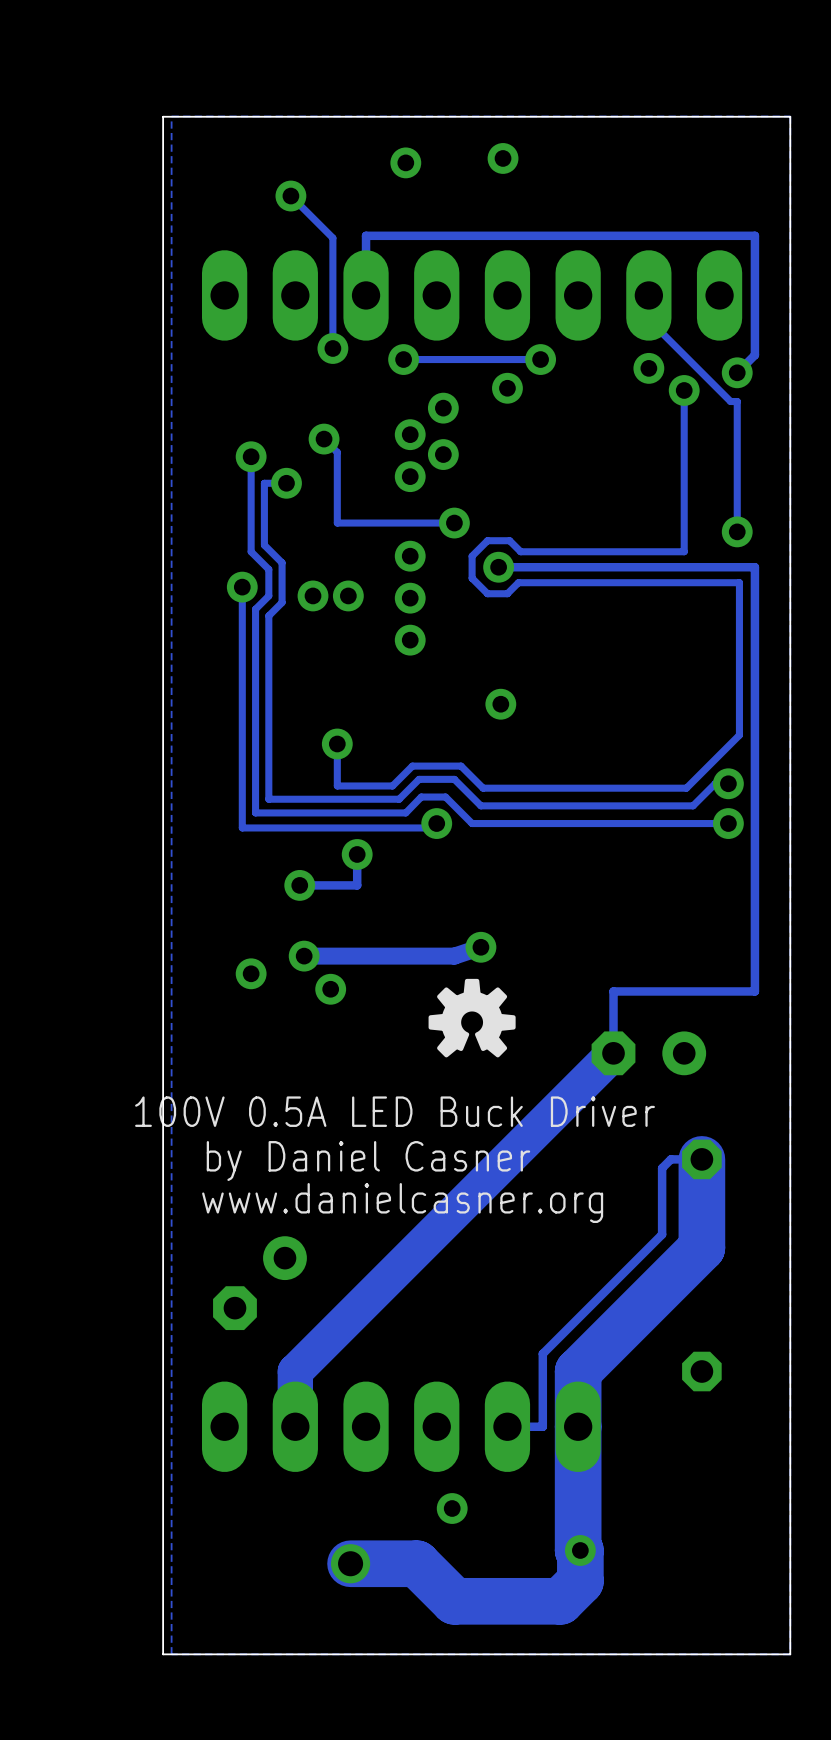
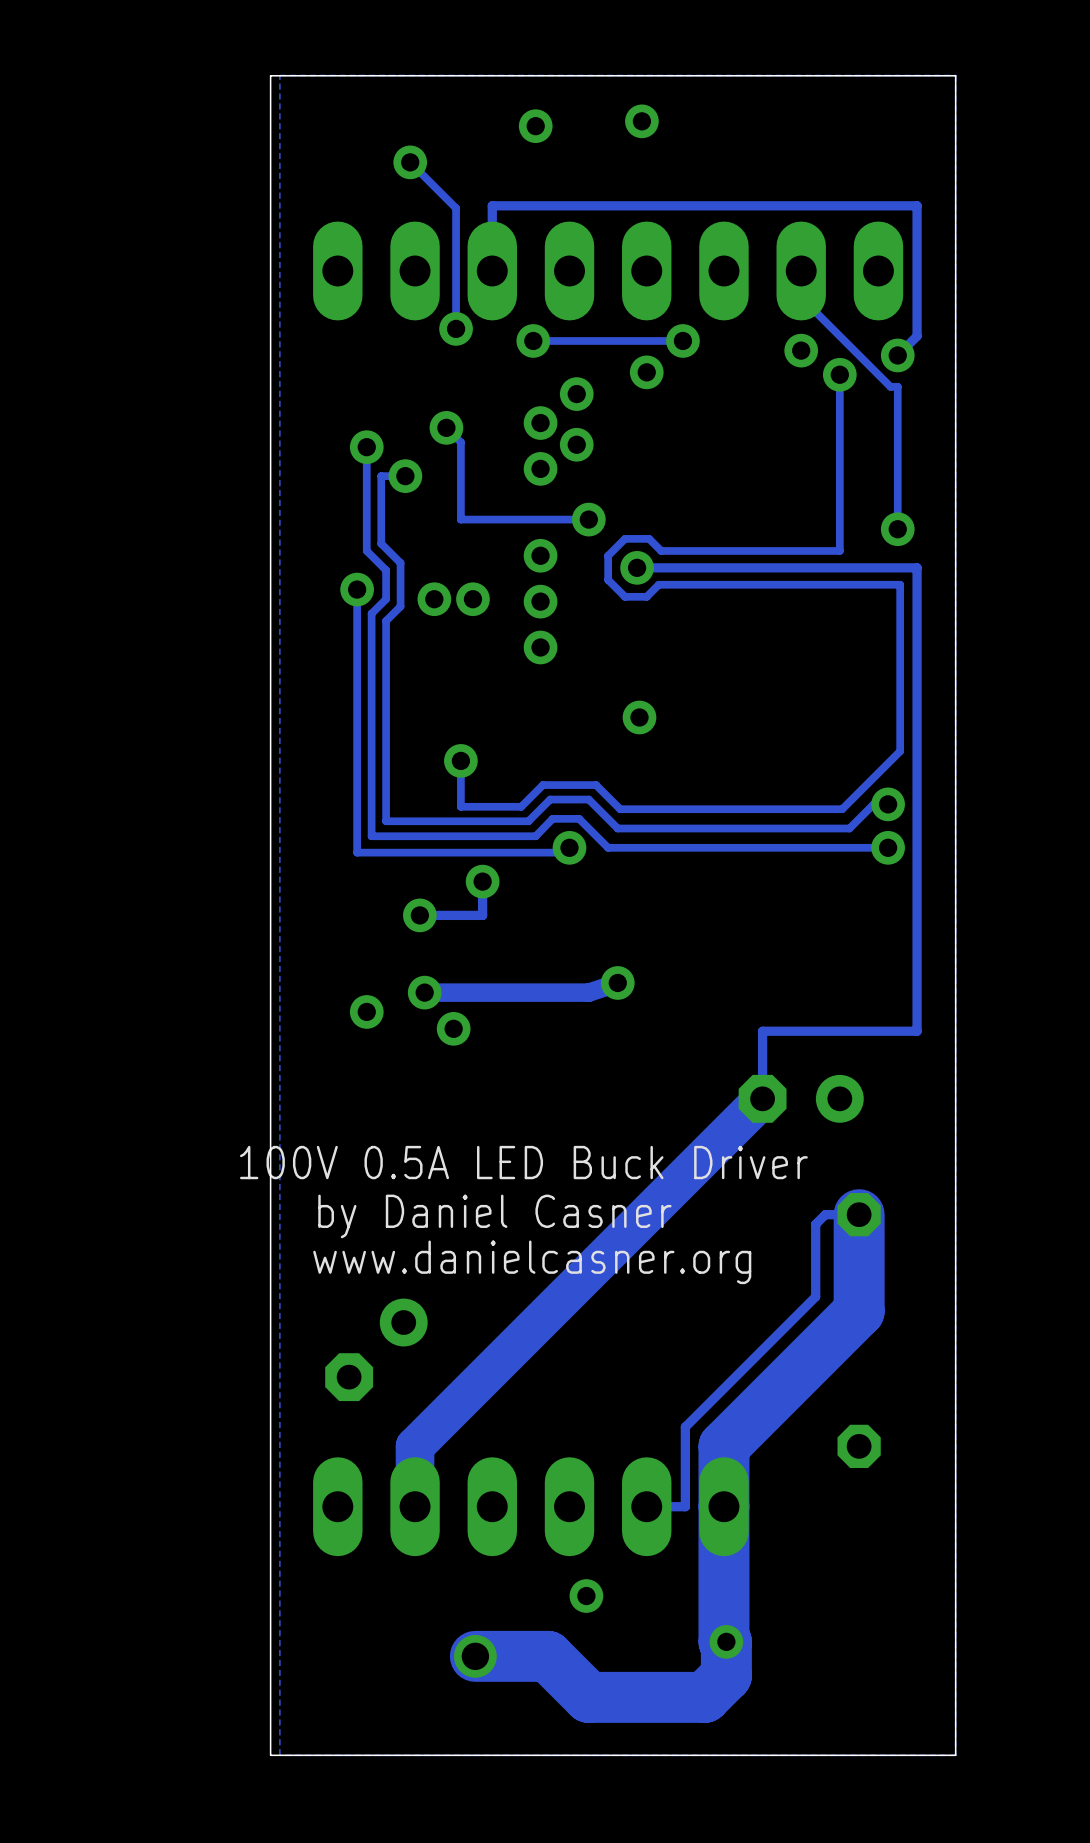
drawing: [428, 978, 516, 1058] -> none

